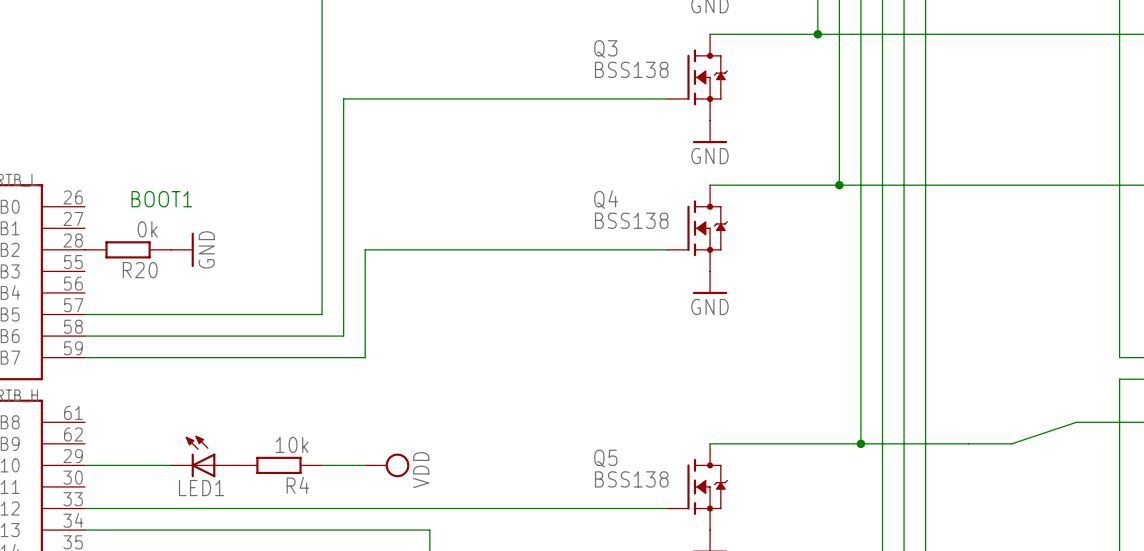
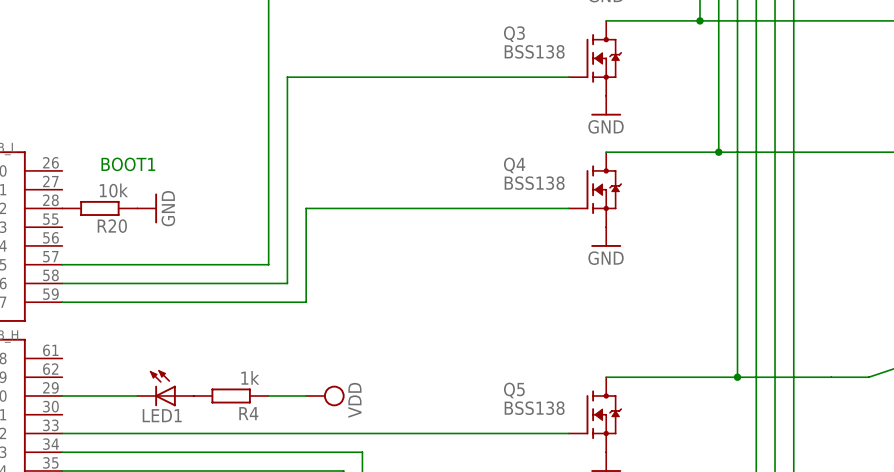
R20 value: 0k (147, 229) -> 10k (113, 190)
R4 value: 10k (292, 444) -> 1k (250, 377)

